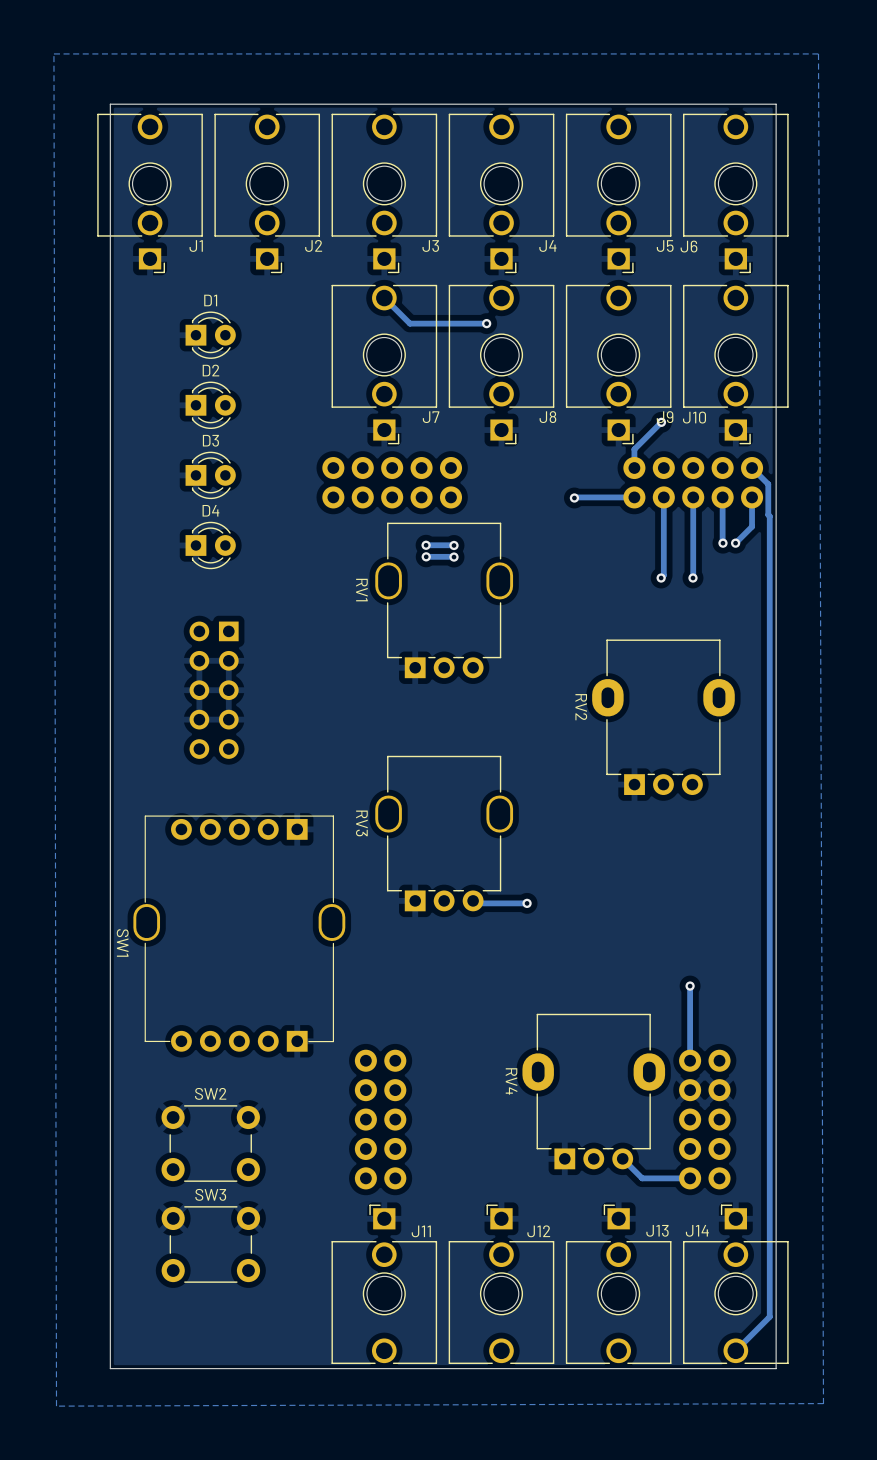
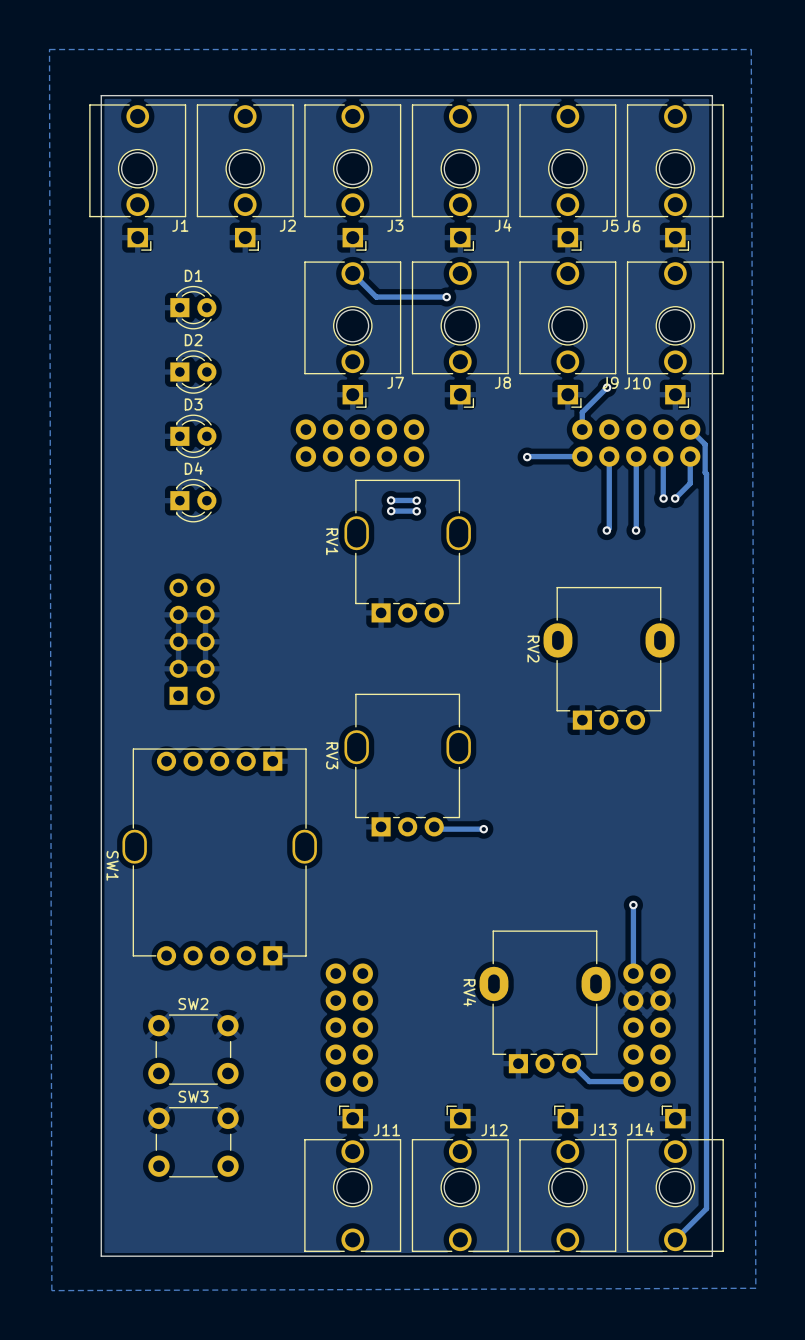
part rotation: 0° (214, 690) -> 180° (192, 641)

